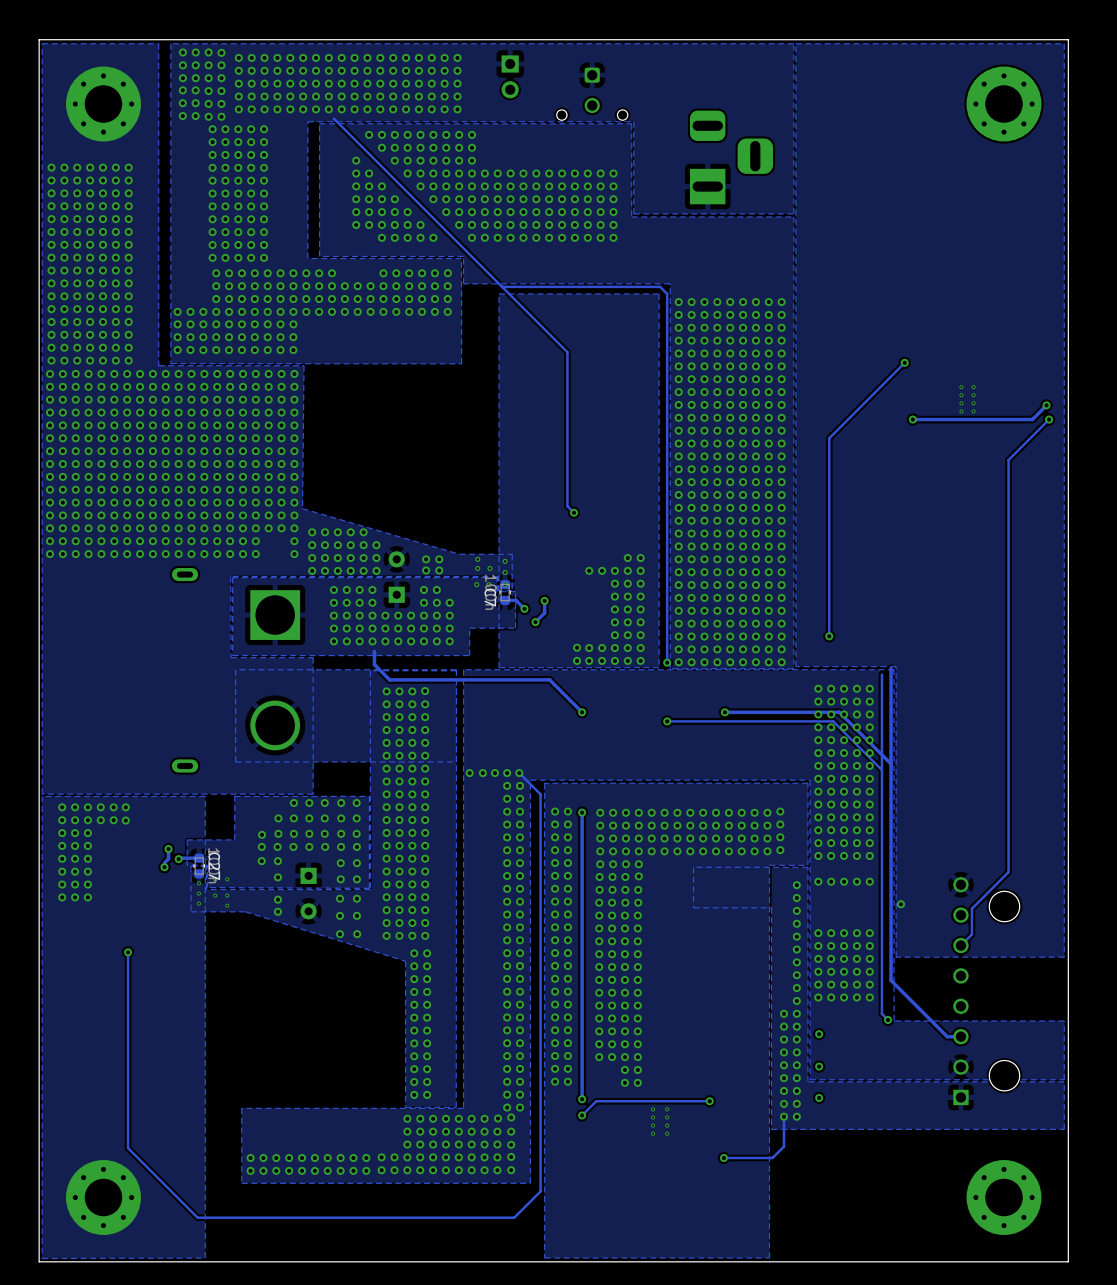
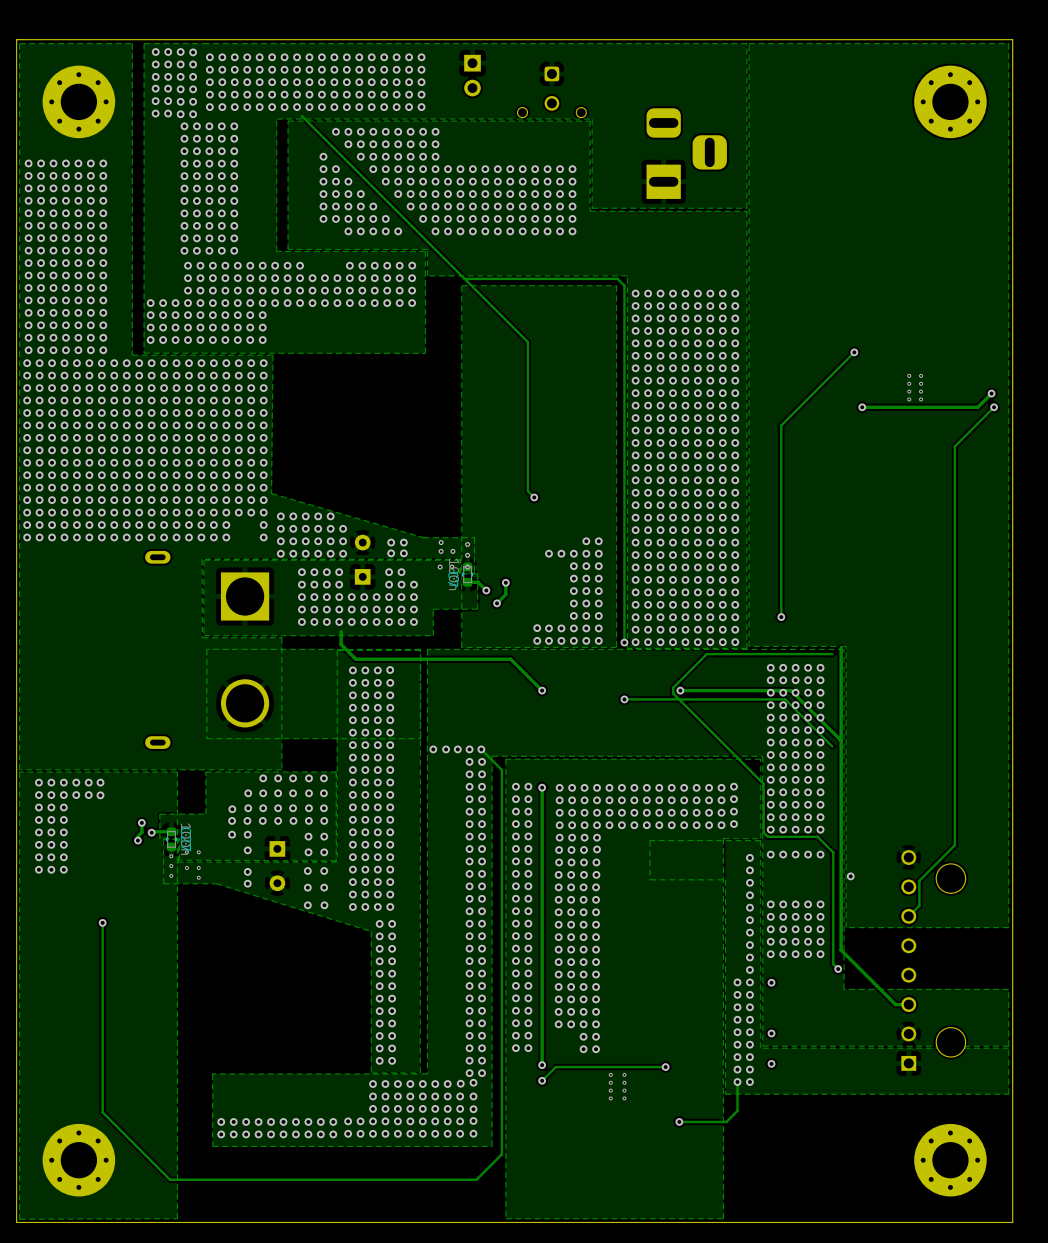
track: (881, 674) (881, 1013) (888, 1019) -> (832, 654) (706, 654) (673, 687) (673, 693) (763, 783) (763, 832) (767, 836) (817, 836) (833, 852) (833, 964) (838, 969)
via: (818, 997) -> none
via: (831, 997) -> none
via: (844, 997) -> none
via: (856, 997) -> none
via: (869, 997) -> none
via: none -> (838, 969)
via: none -> (771, 982)
via: (888, 1019) -> none
via: (819, 1034) -> none

